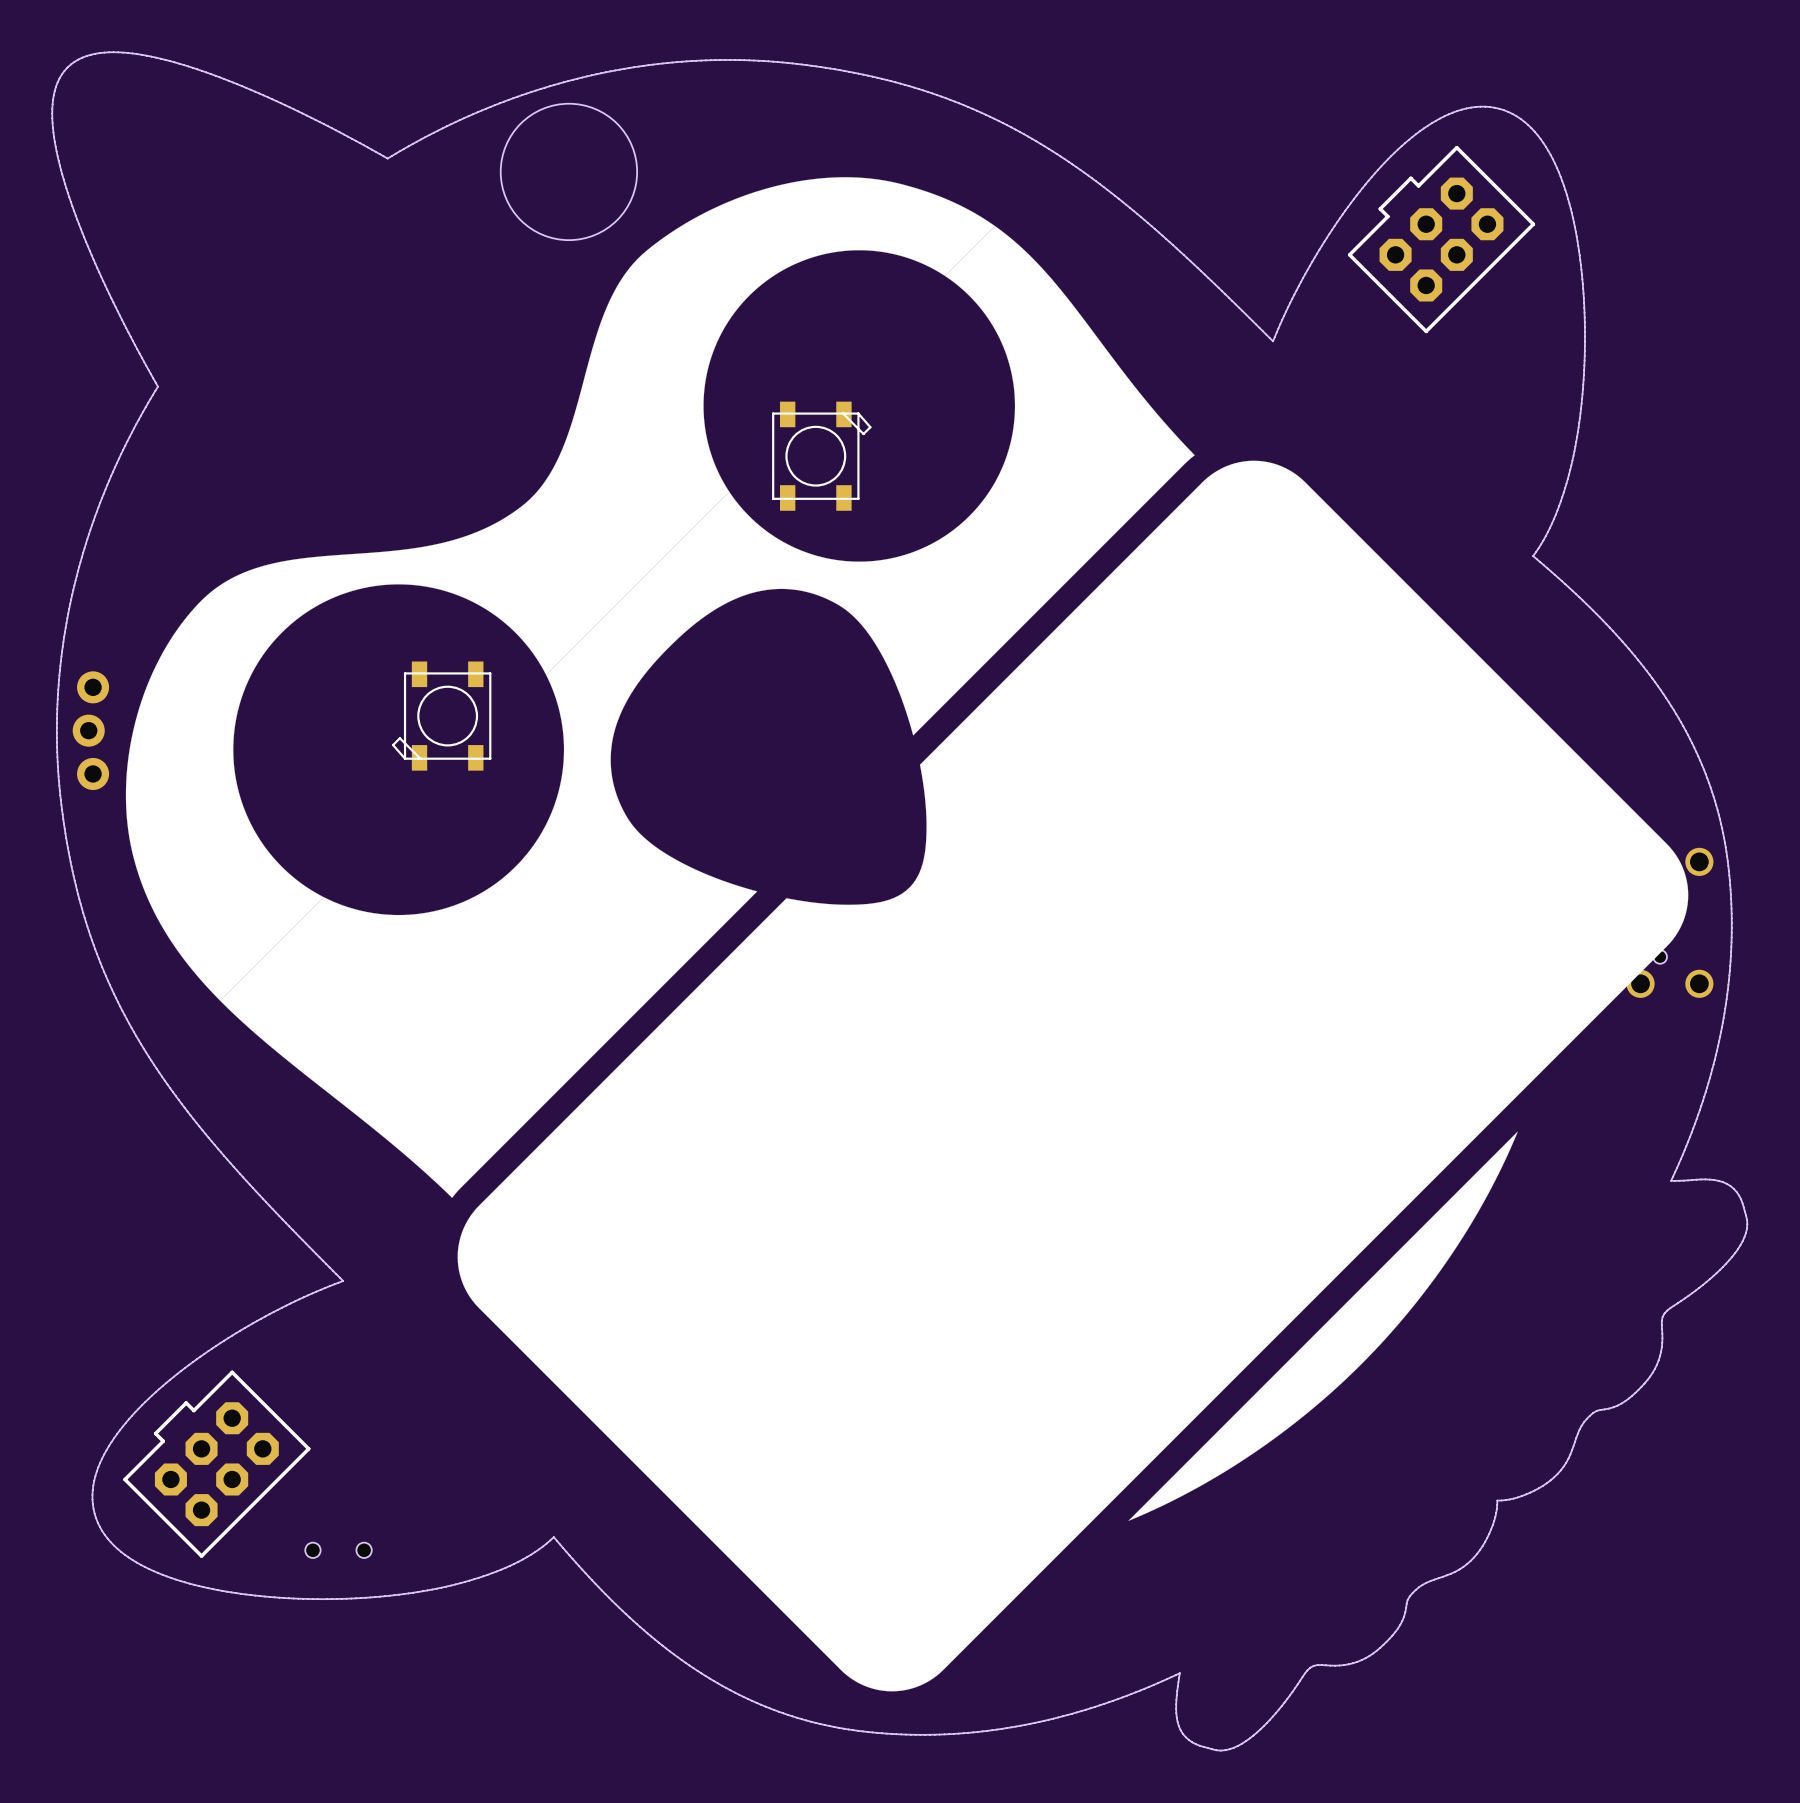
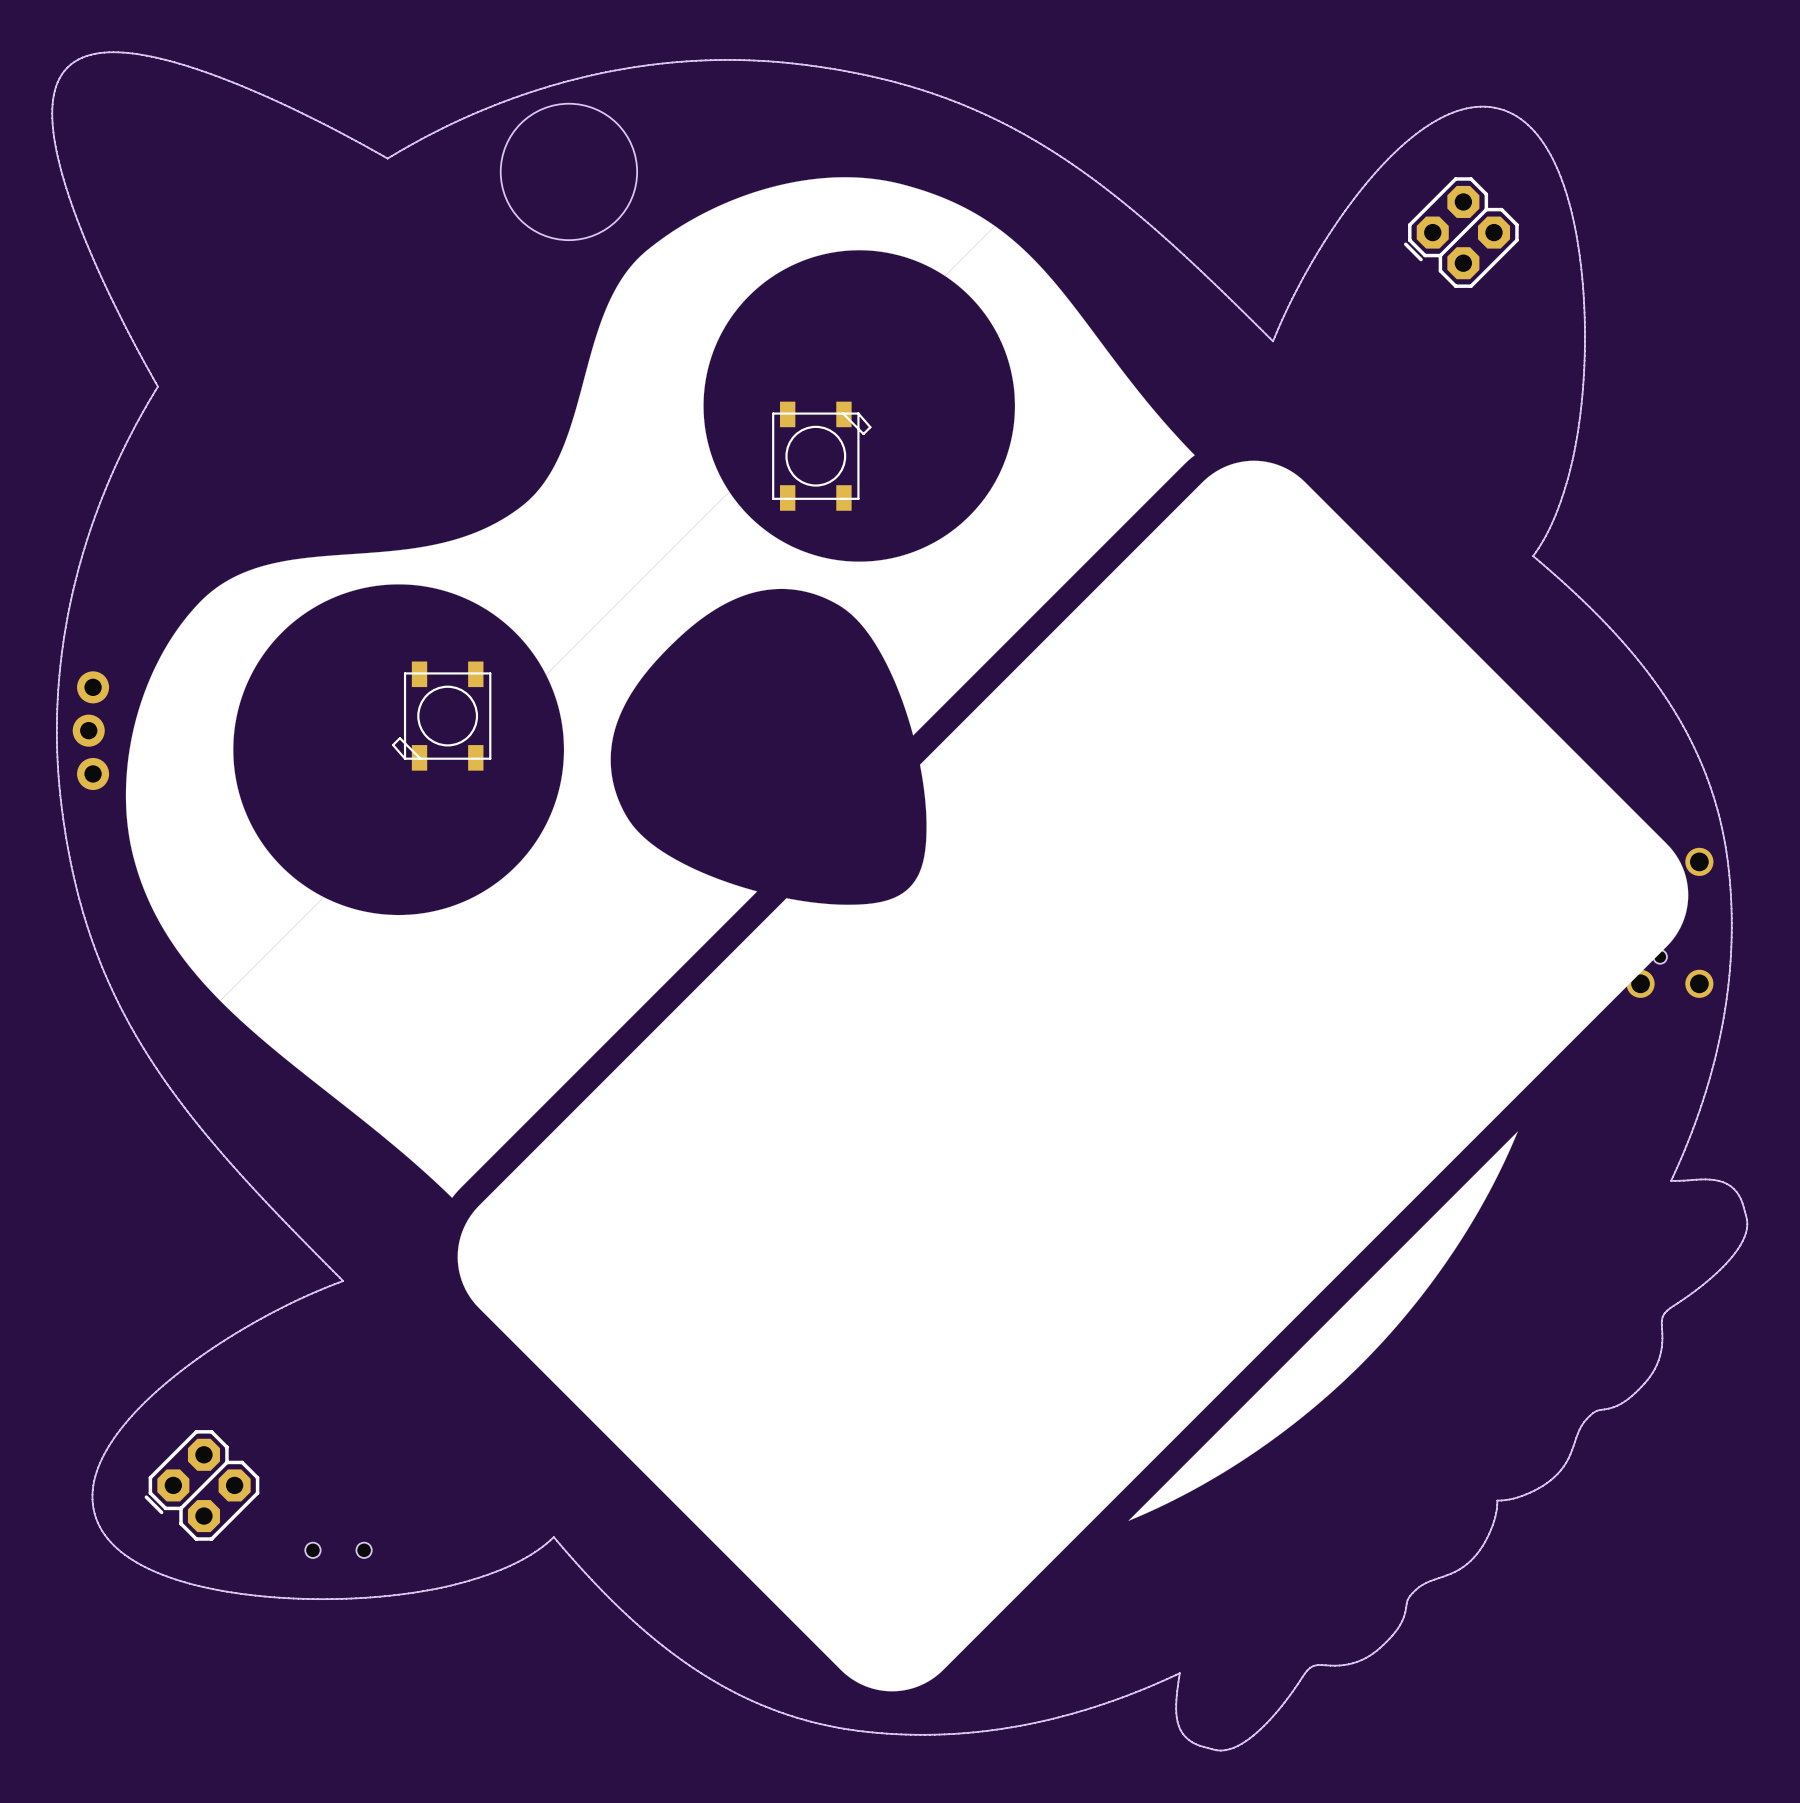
part: none -> (1461, 232)
part: (1441, 239) -> none
part: (216, 1464) -> none
part: none -> (201, 1485)

